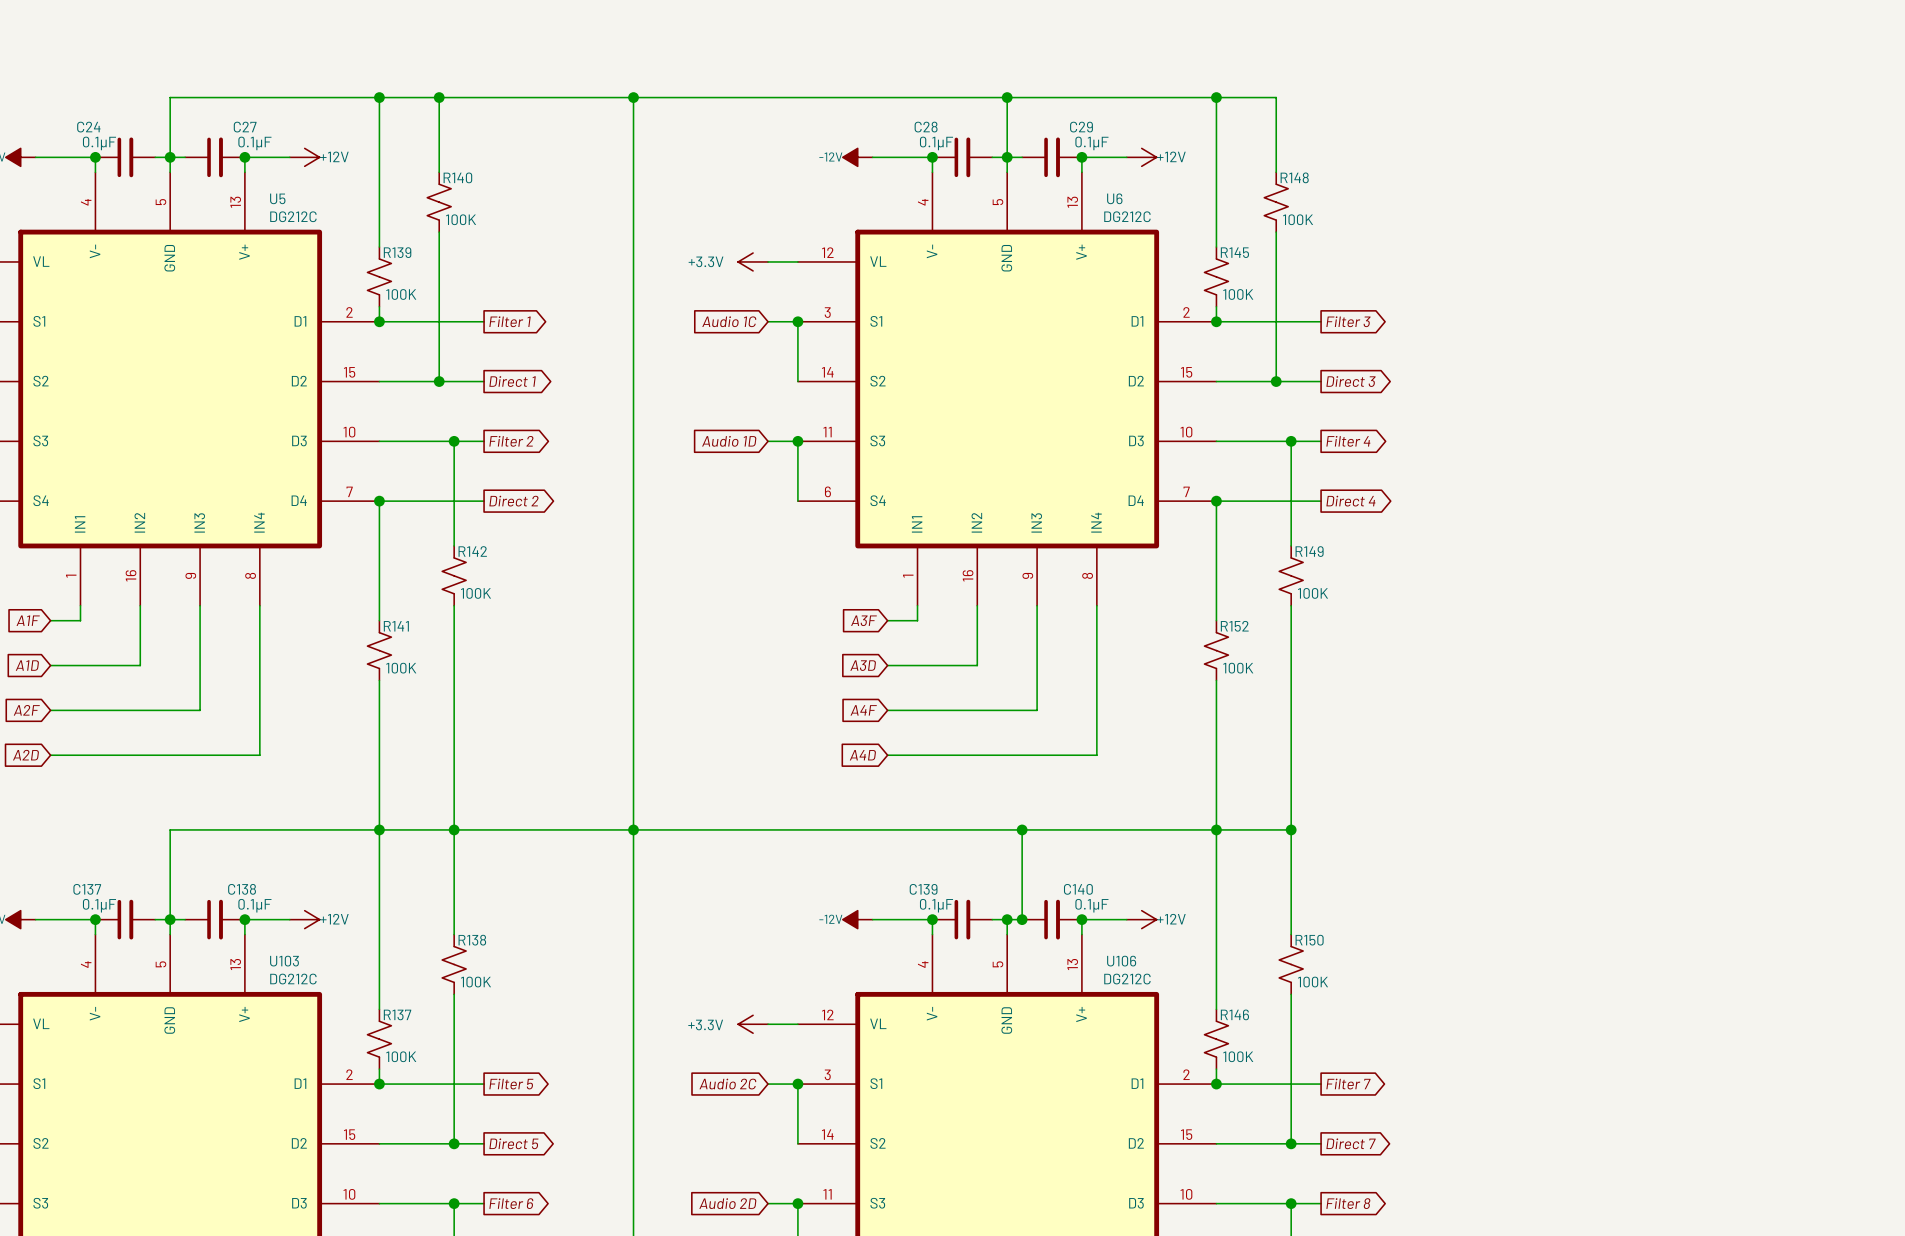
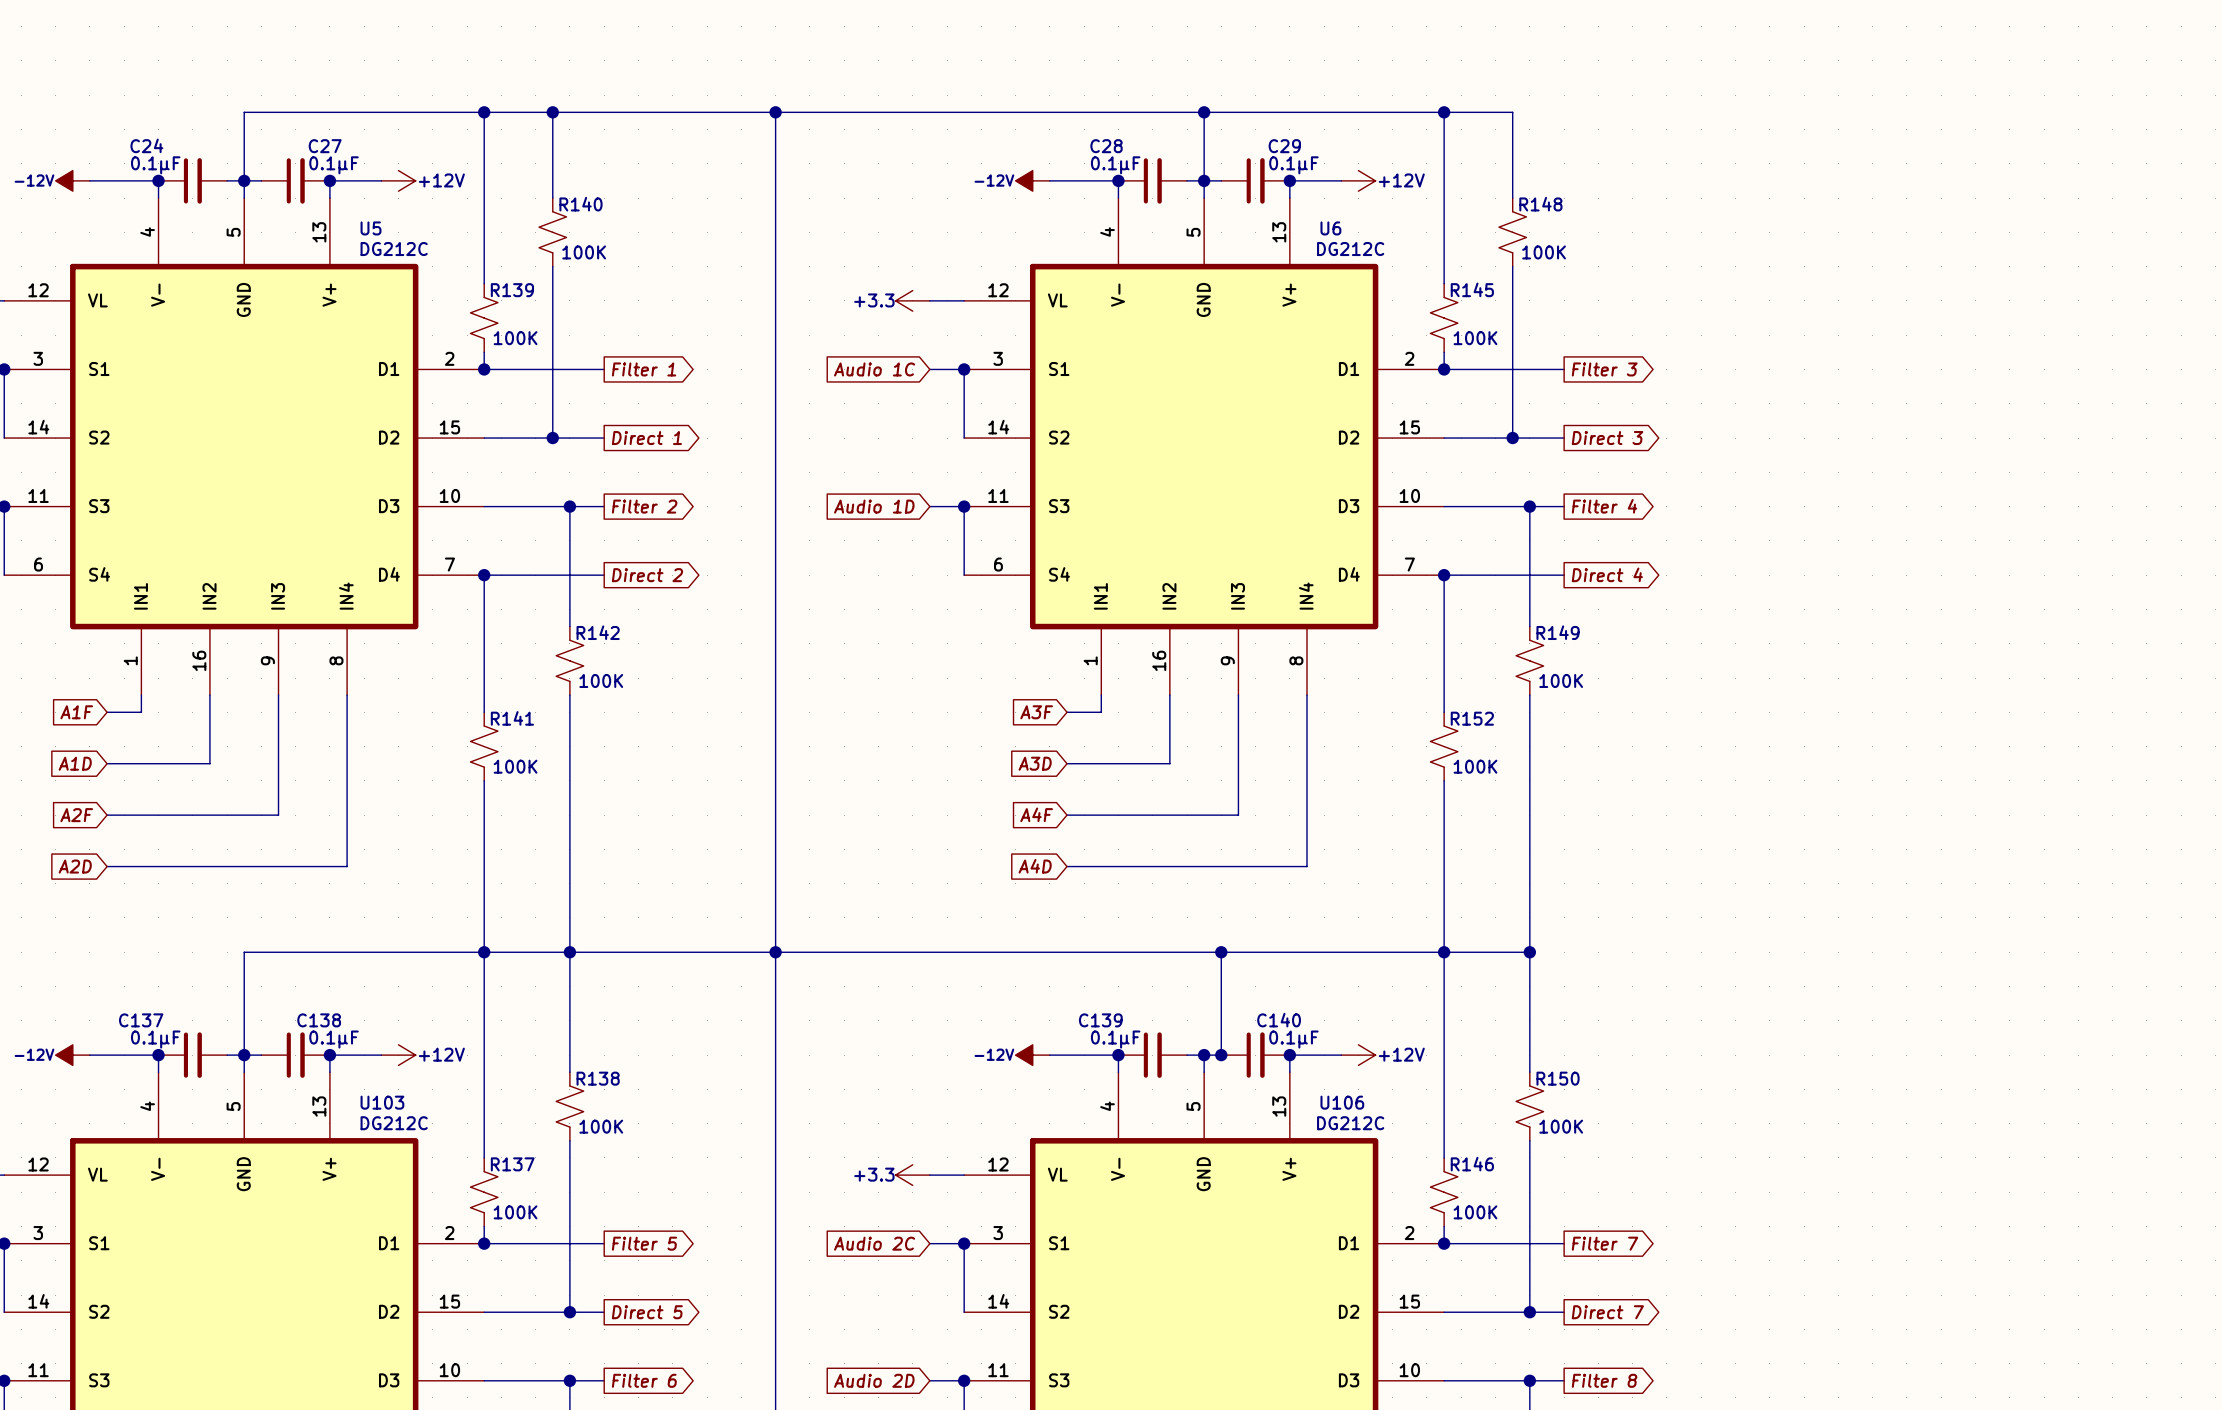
power symbol: +3.3V (753, 261) -> +3.3 (912, 300)
power symbol: +3.3V (753, 1024) -> +3.3 (912, 1175)

